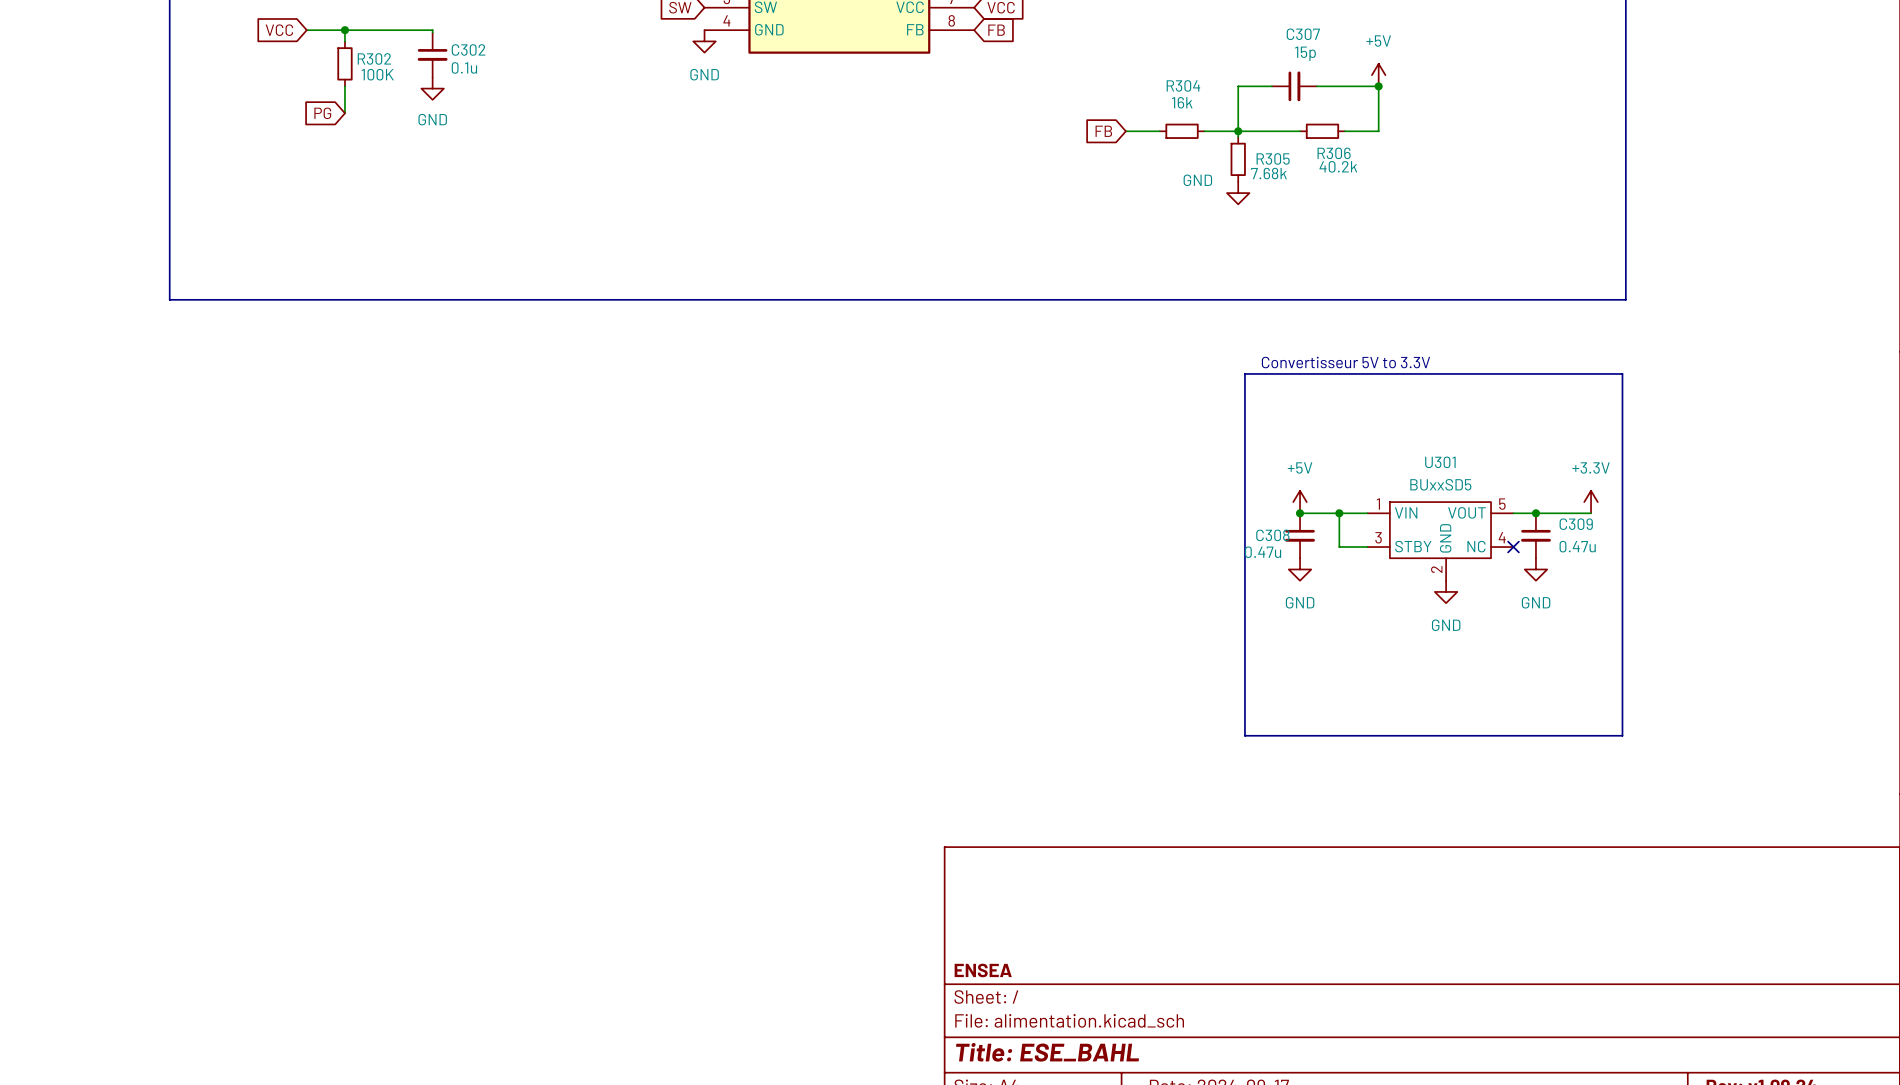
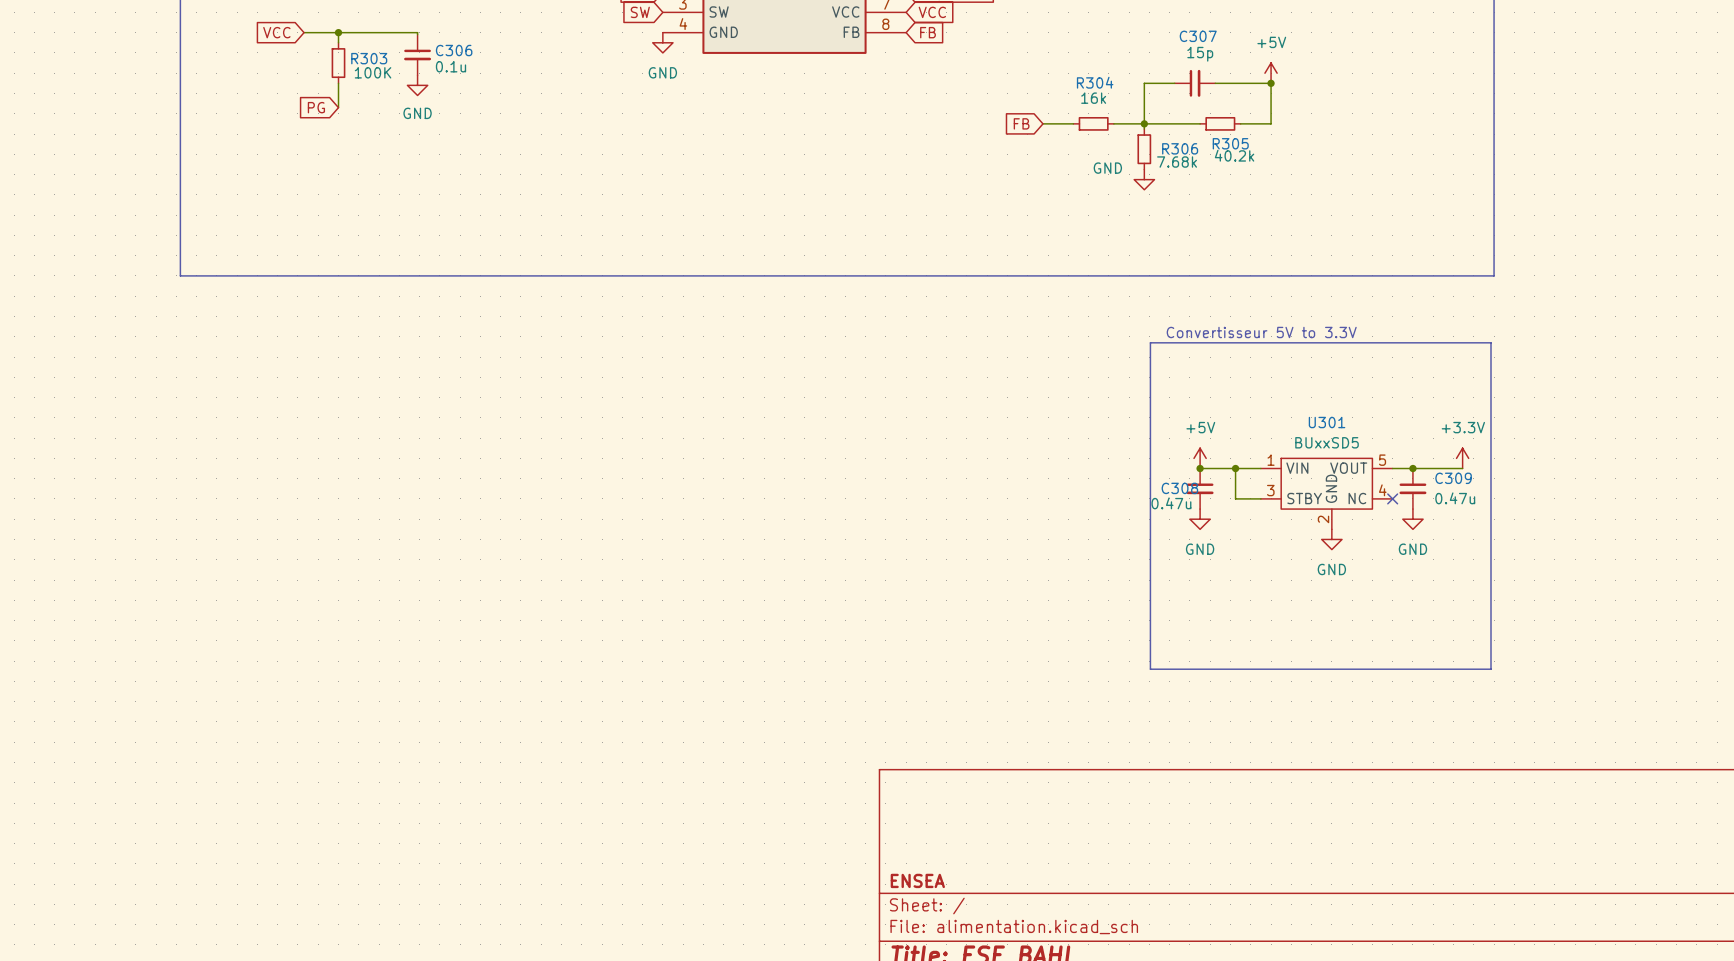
C302 name: C302 (468, 49) -> C306 (454, 50)
R302 name: R302 (374, 58) -> R303 (369, 58)
R306 name: R306 (1334, 153) -> R305 (1230, 143)
R305 name: R305 (1273, 158) -> R306 (1180, 148)

